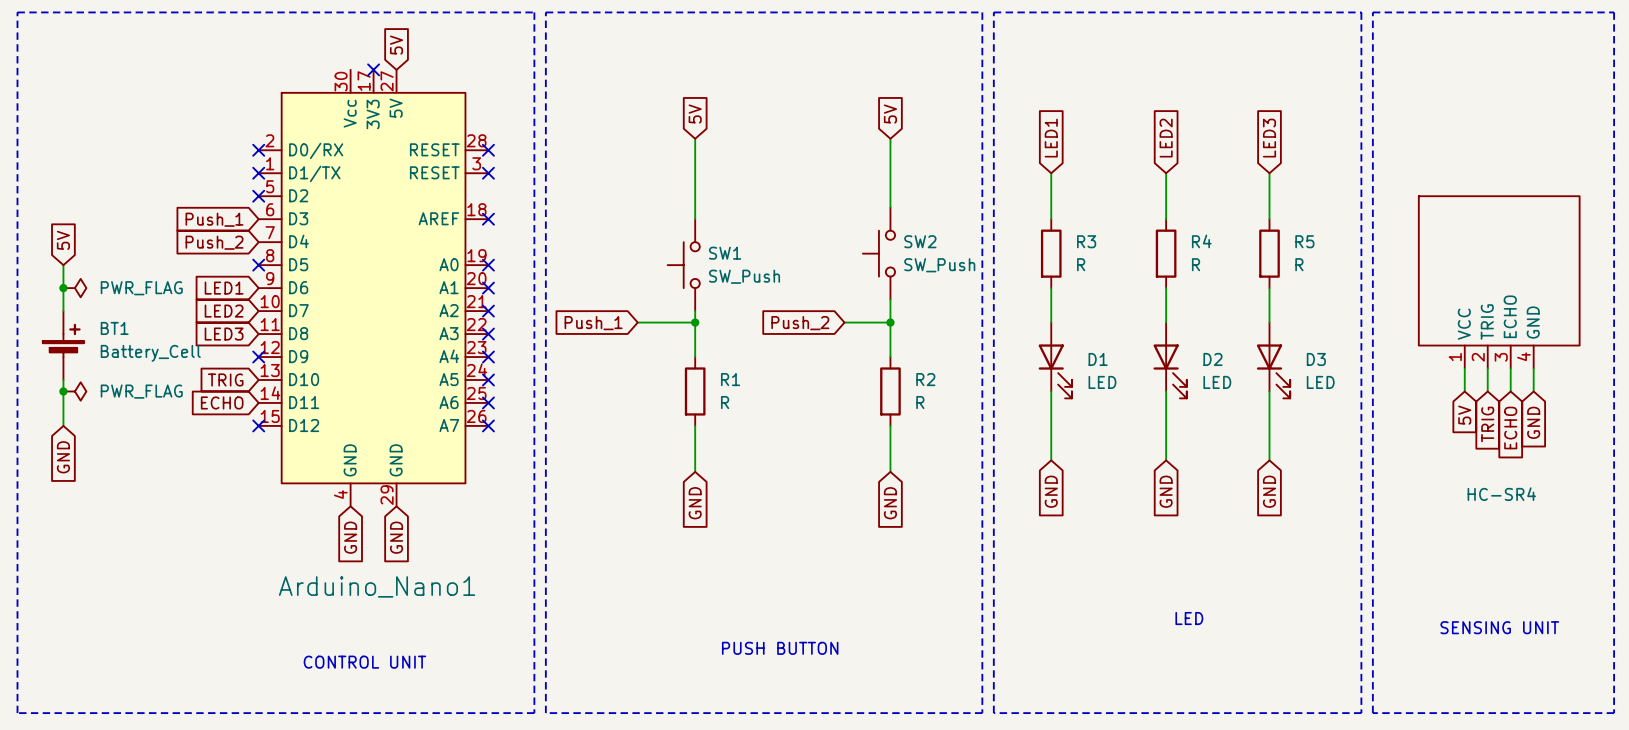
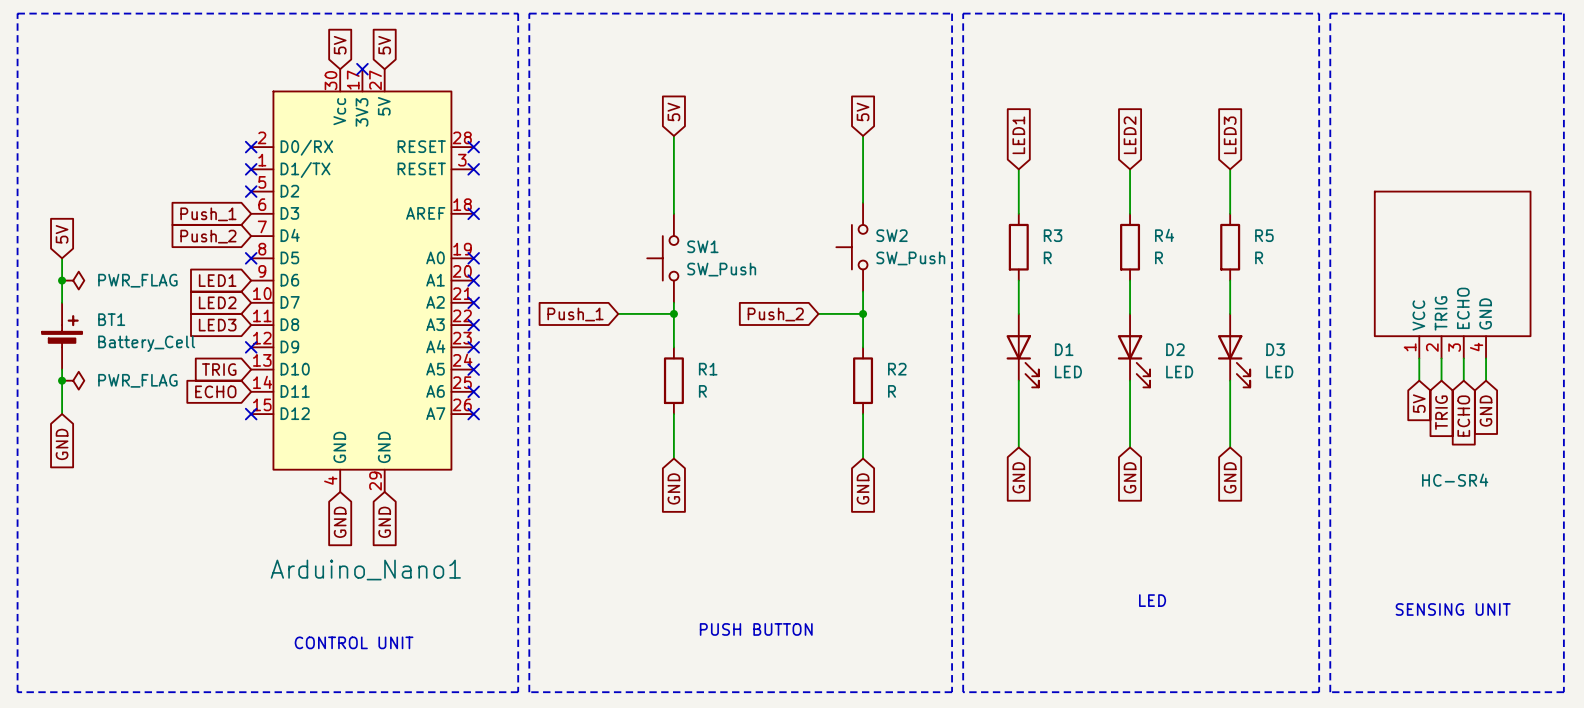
global label: none -> 5V (340, 45)

